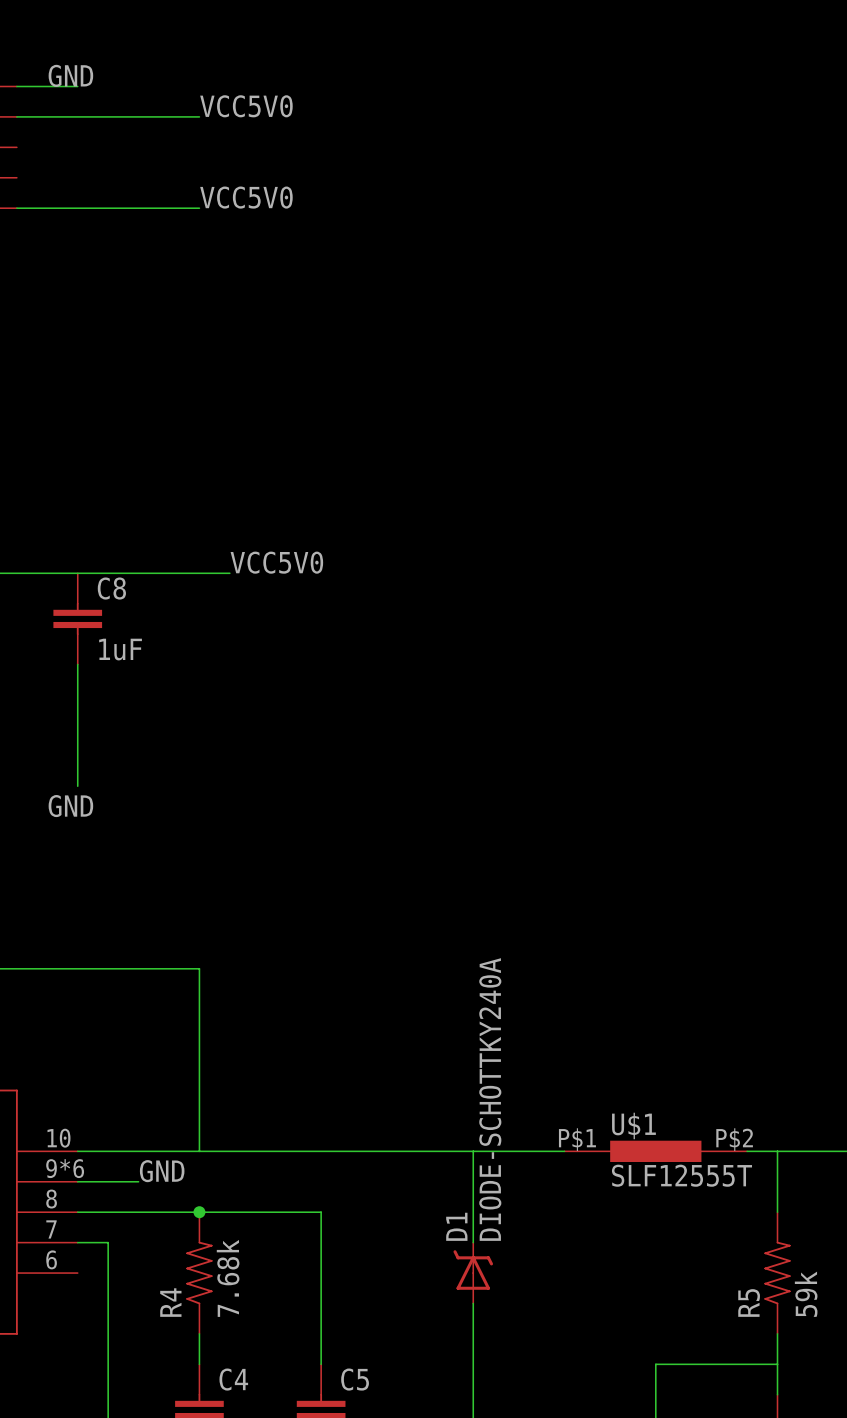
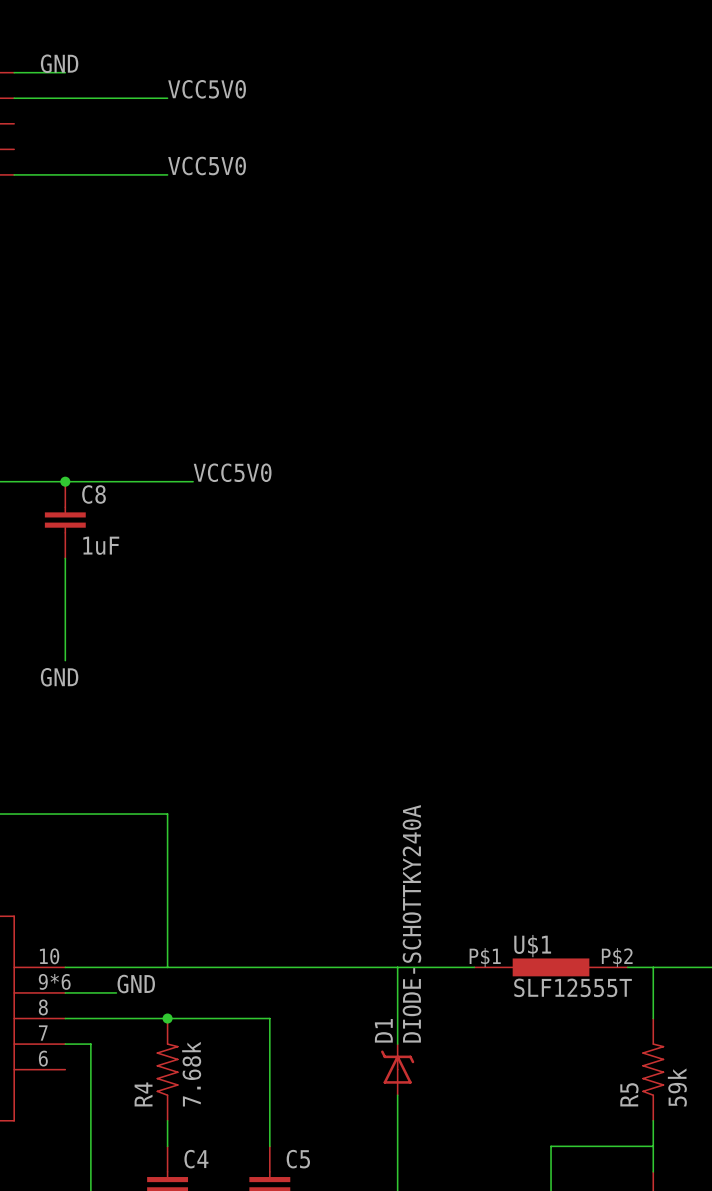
junction: none -> (65, 481)

